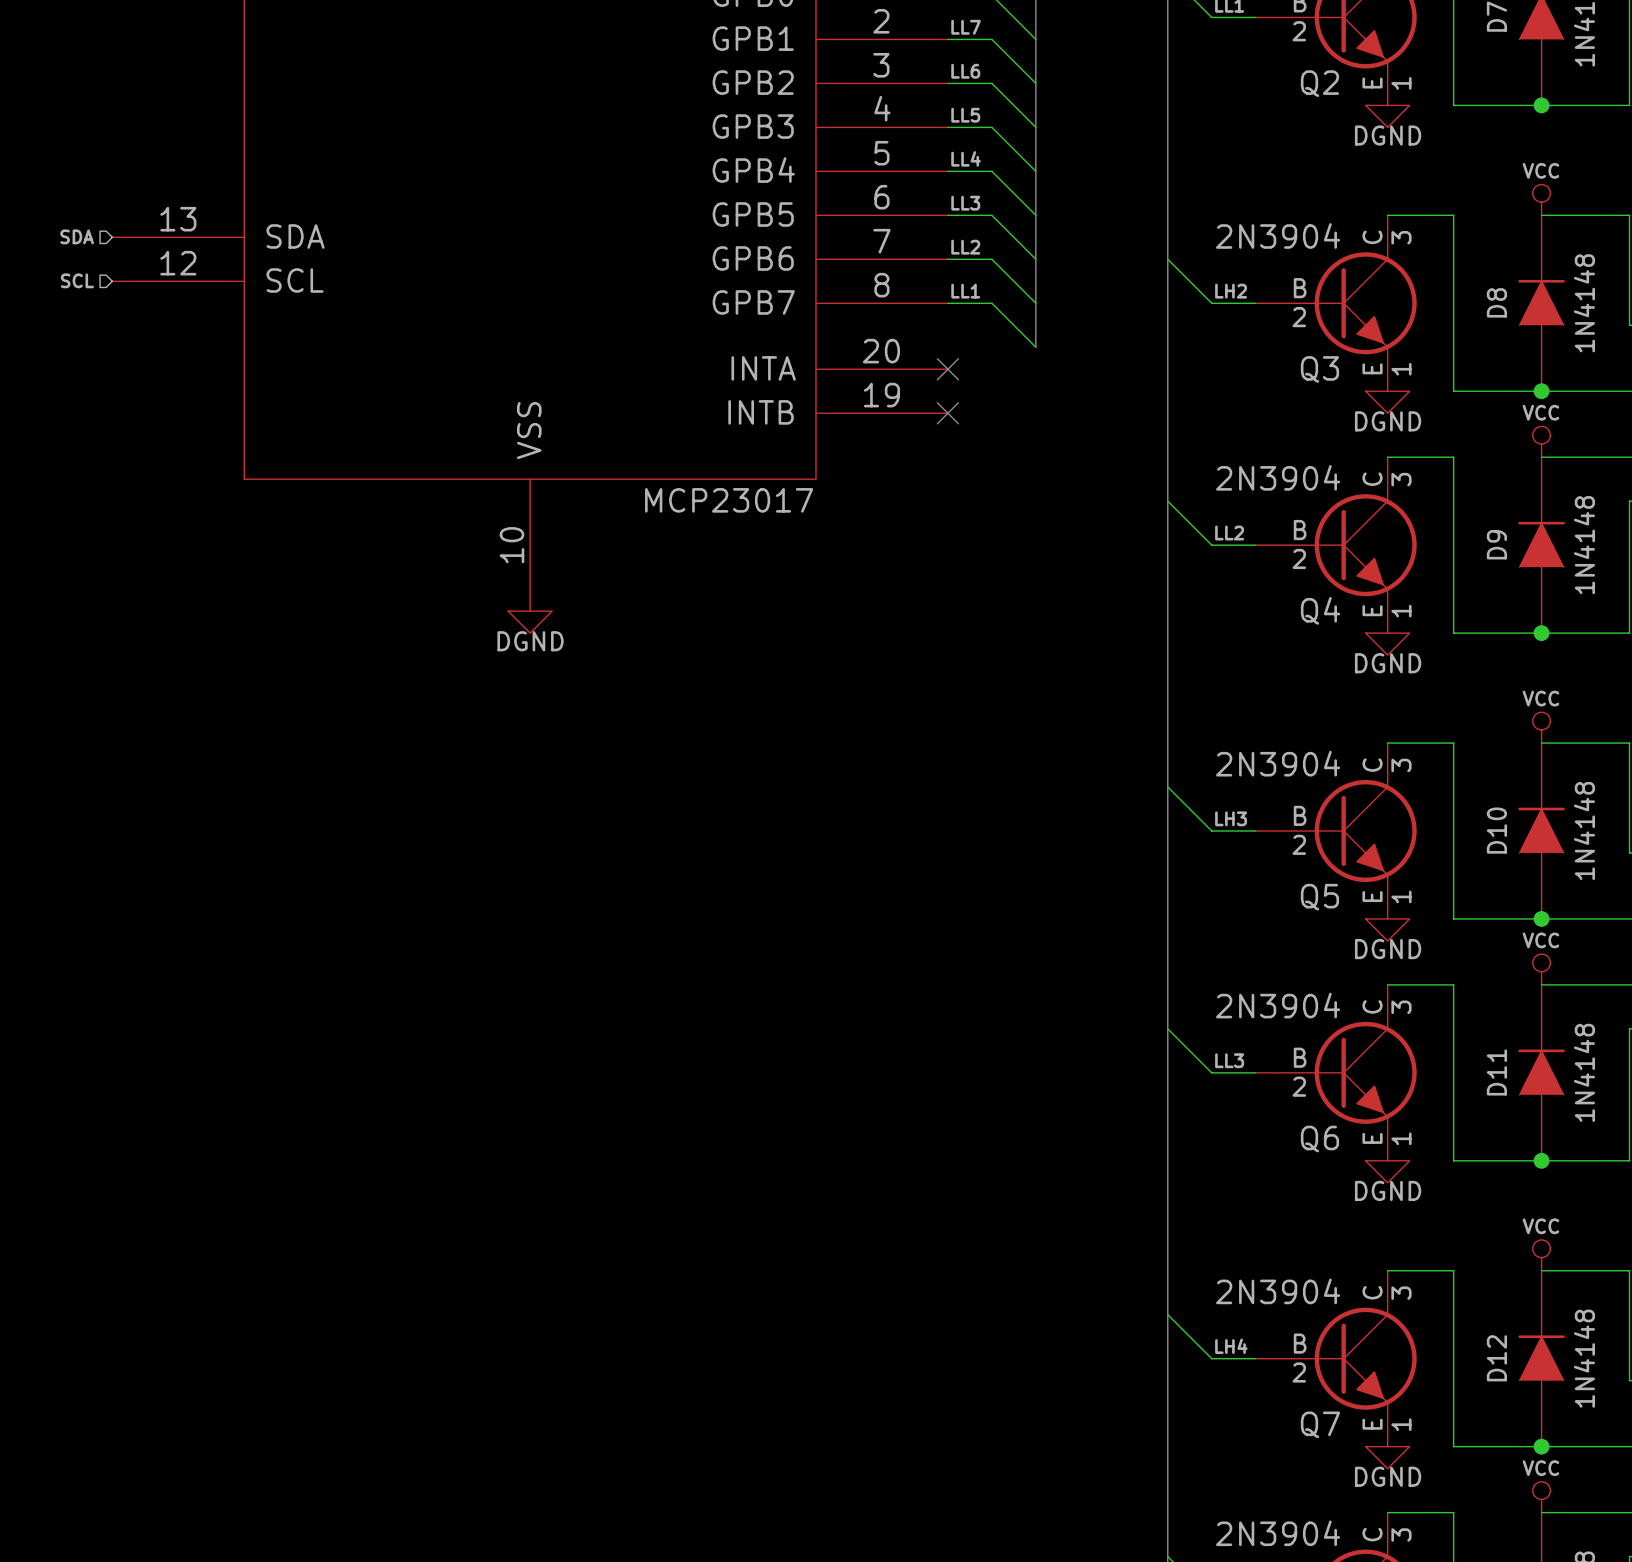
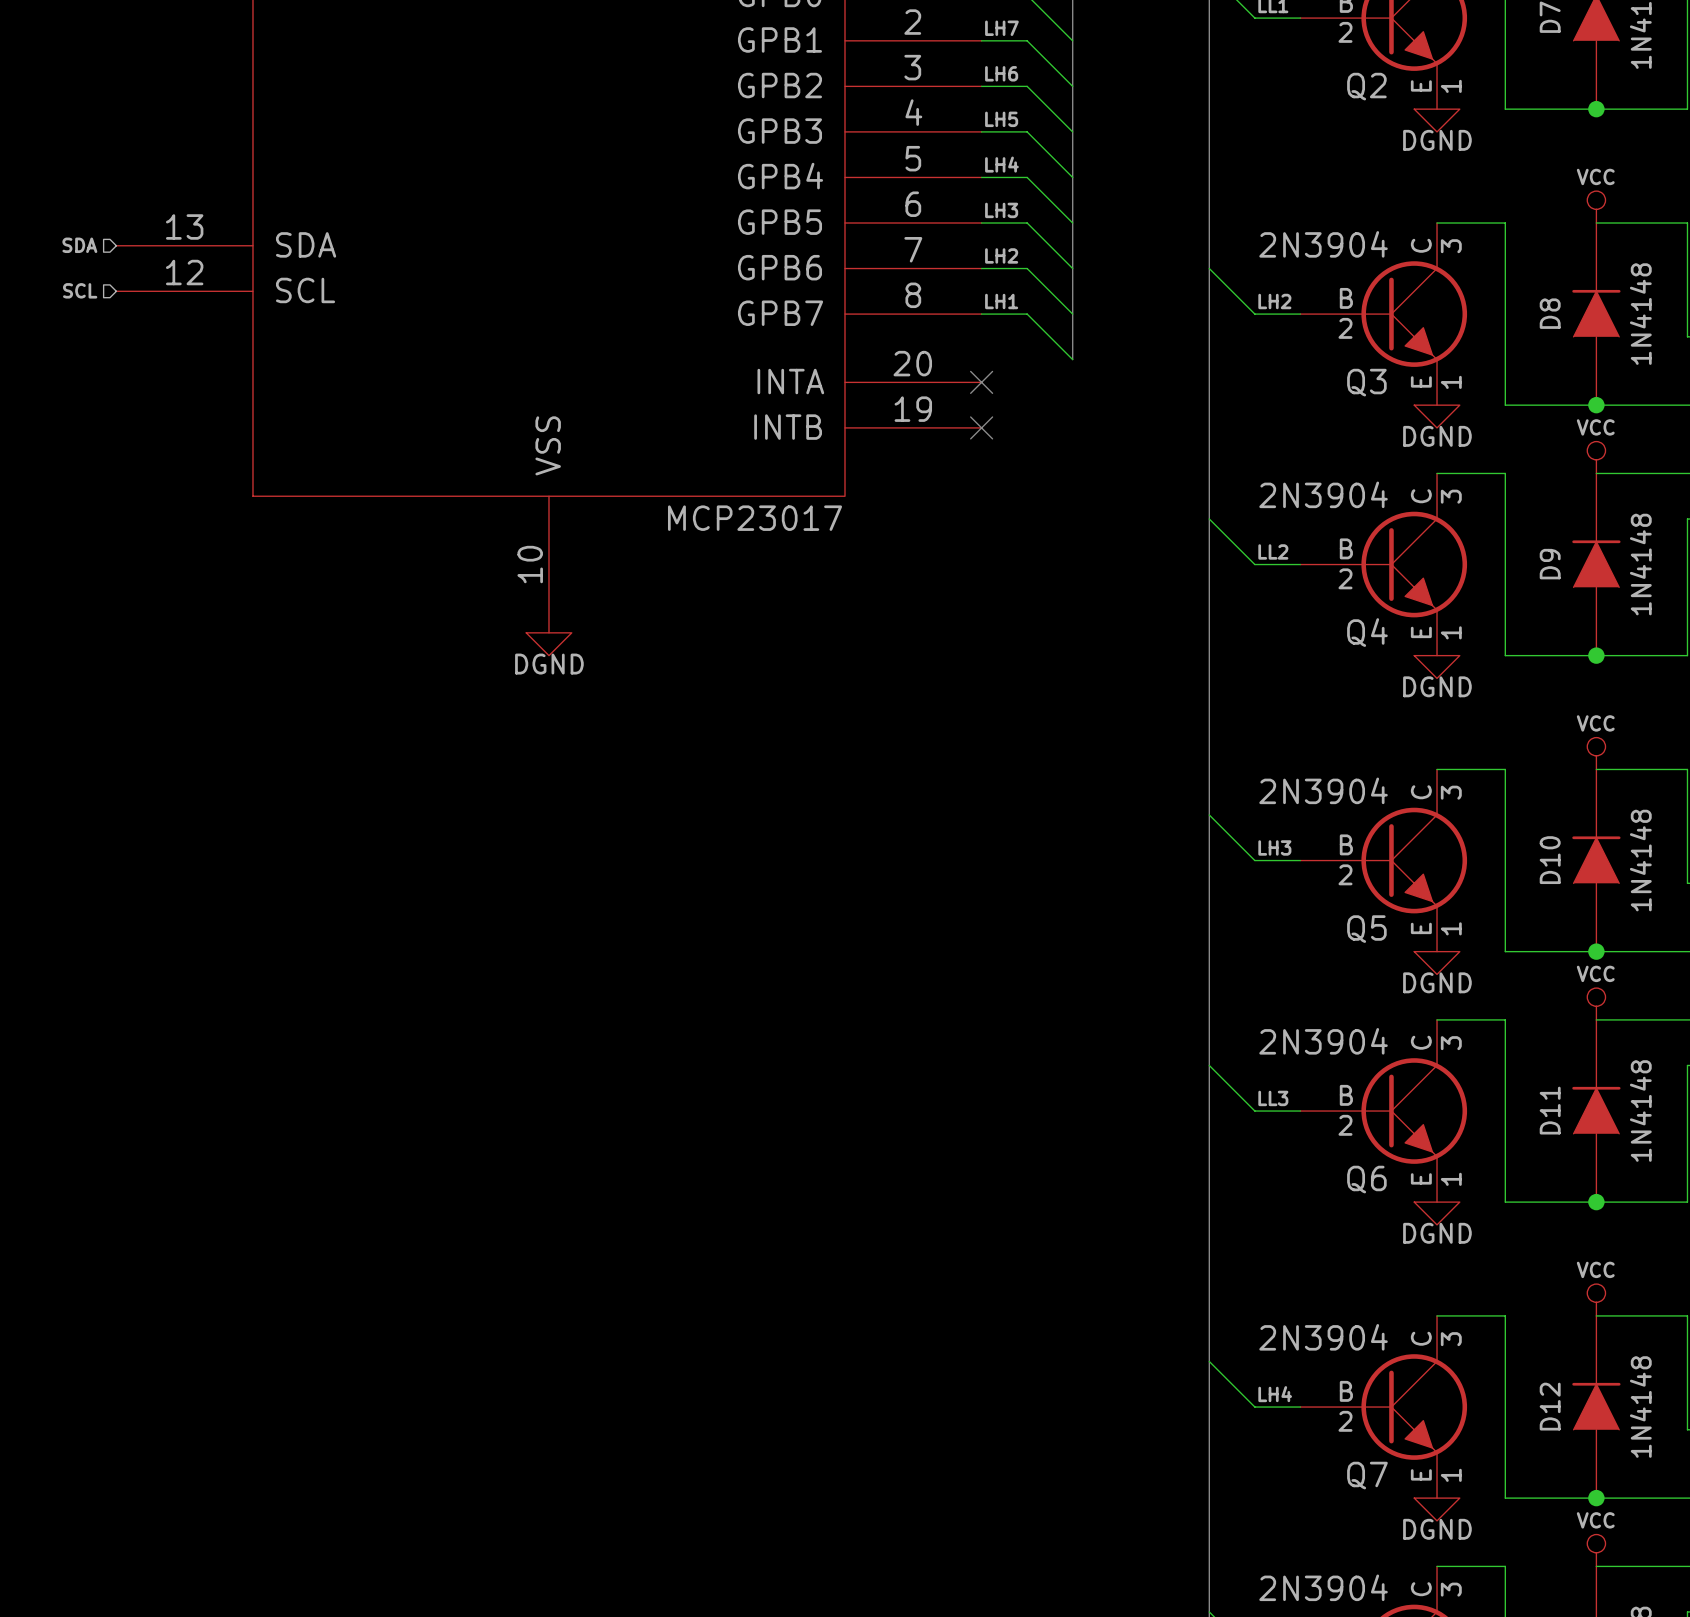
label: LL7 (966, 27) -> LH7 (1001, 28)
label: LL6 (965, 71) -> LH6 (1001, 73)
label: LL5 (965, 115) -> LH5 (1001, 119)
label: LL4 (966, 158) -> LH4 (1001, 164)
label: LL3 (965, 203) -> LH3 (1001, 210)
label: LL2 (965, 247) -> LH2 (1001, 255)
label: LL1 (965, 291) -> LH1 (1001, 301)

